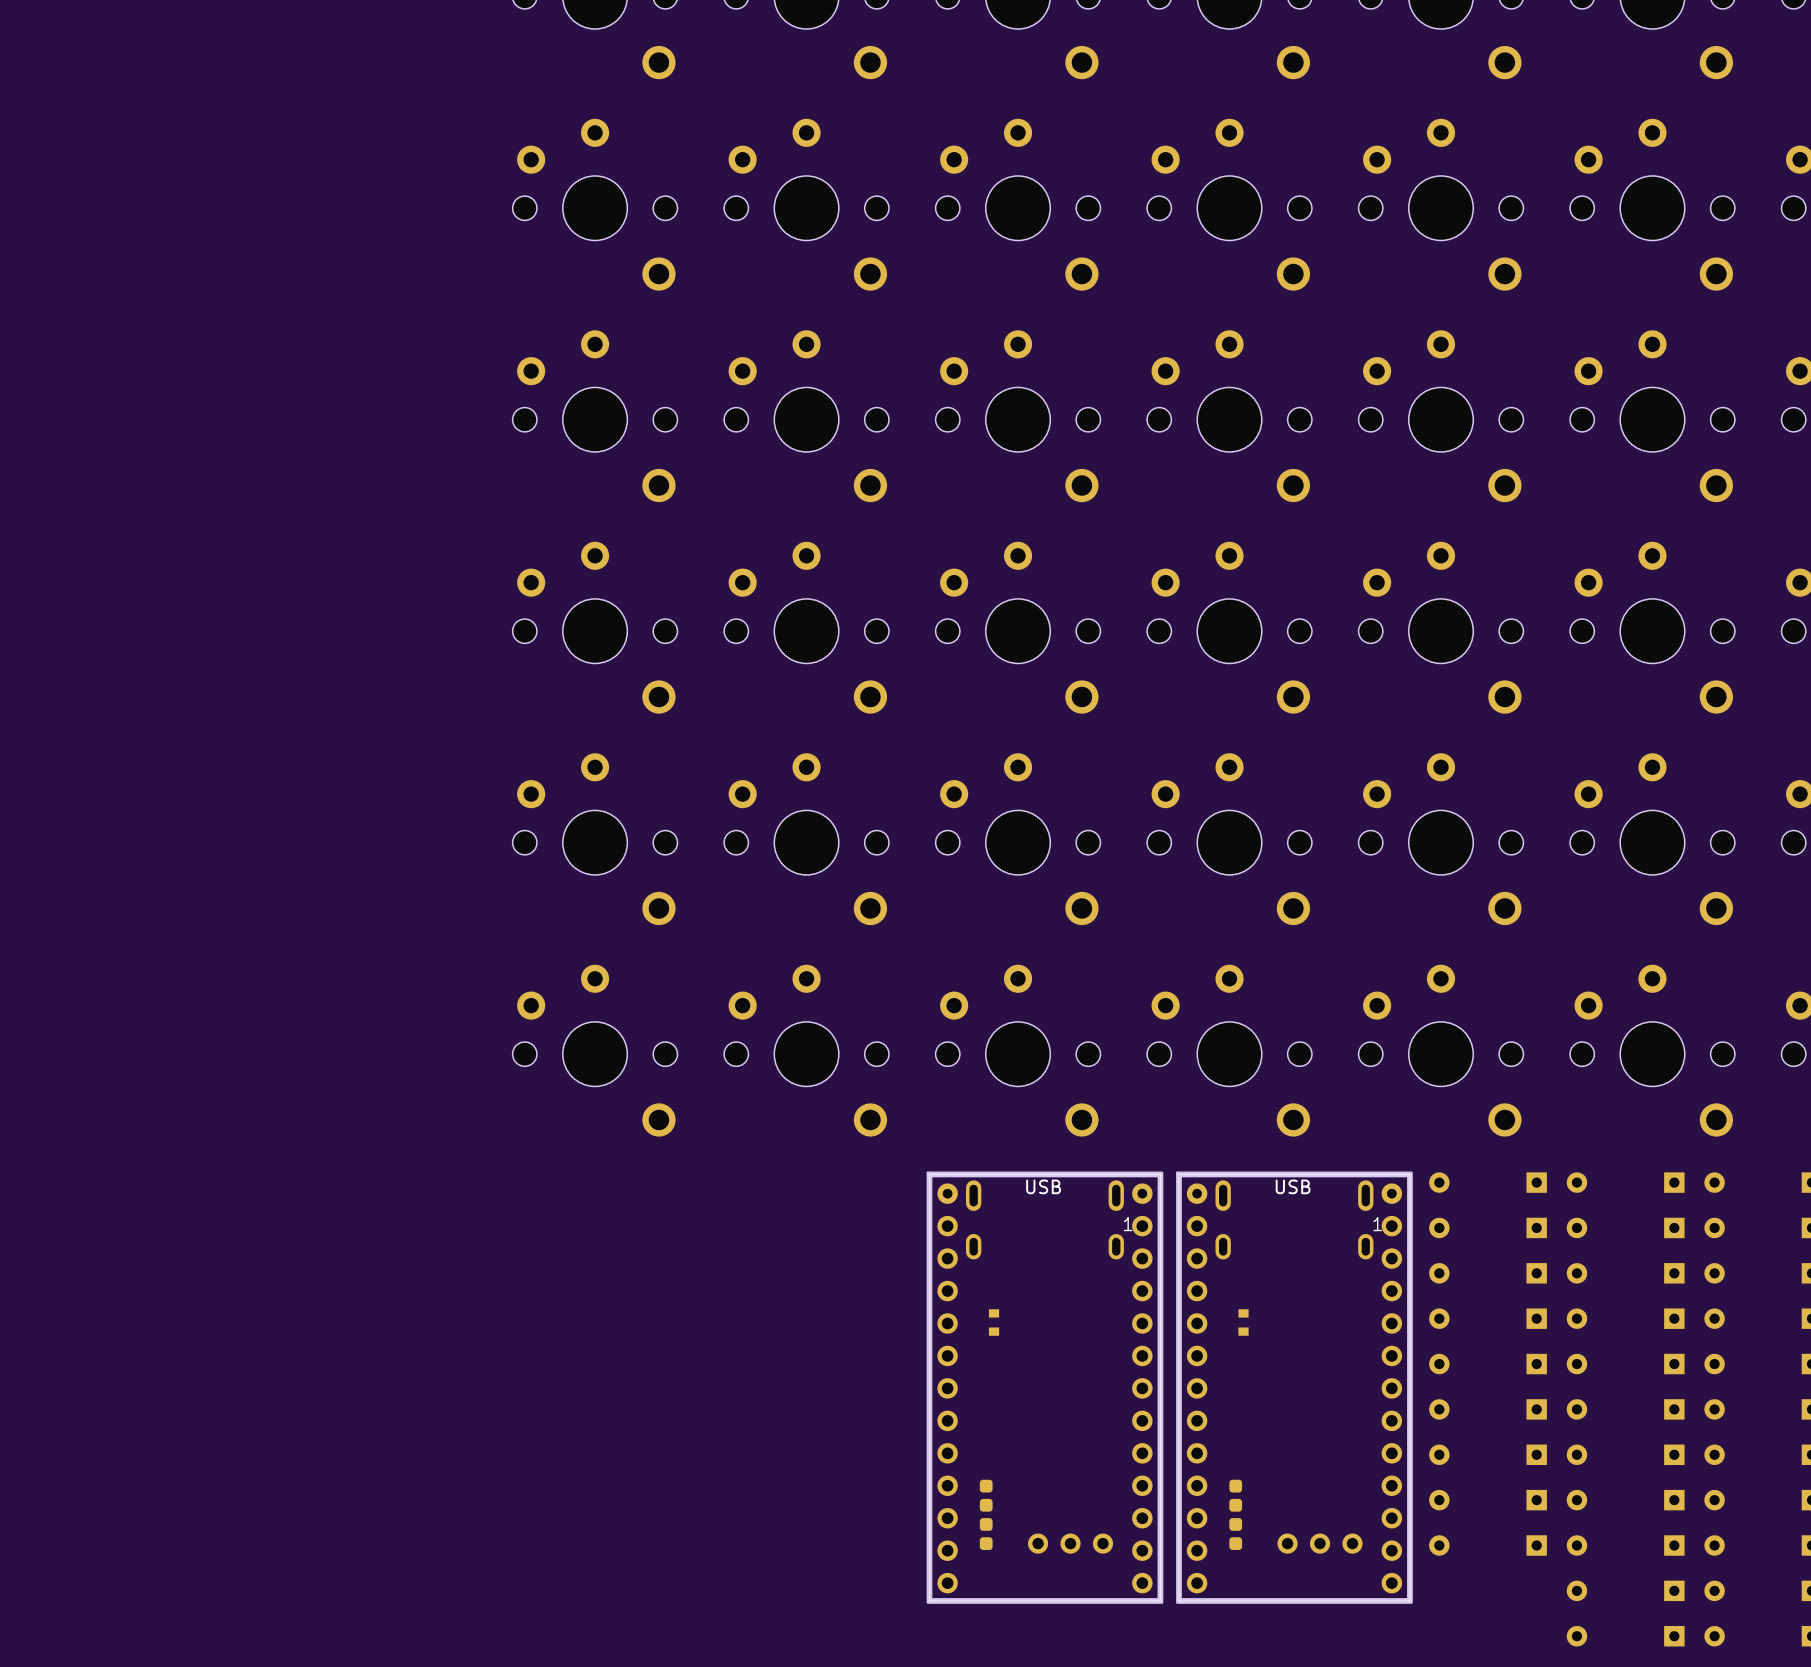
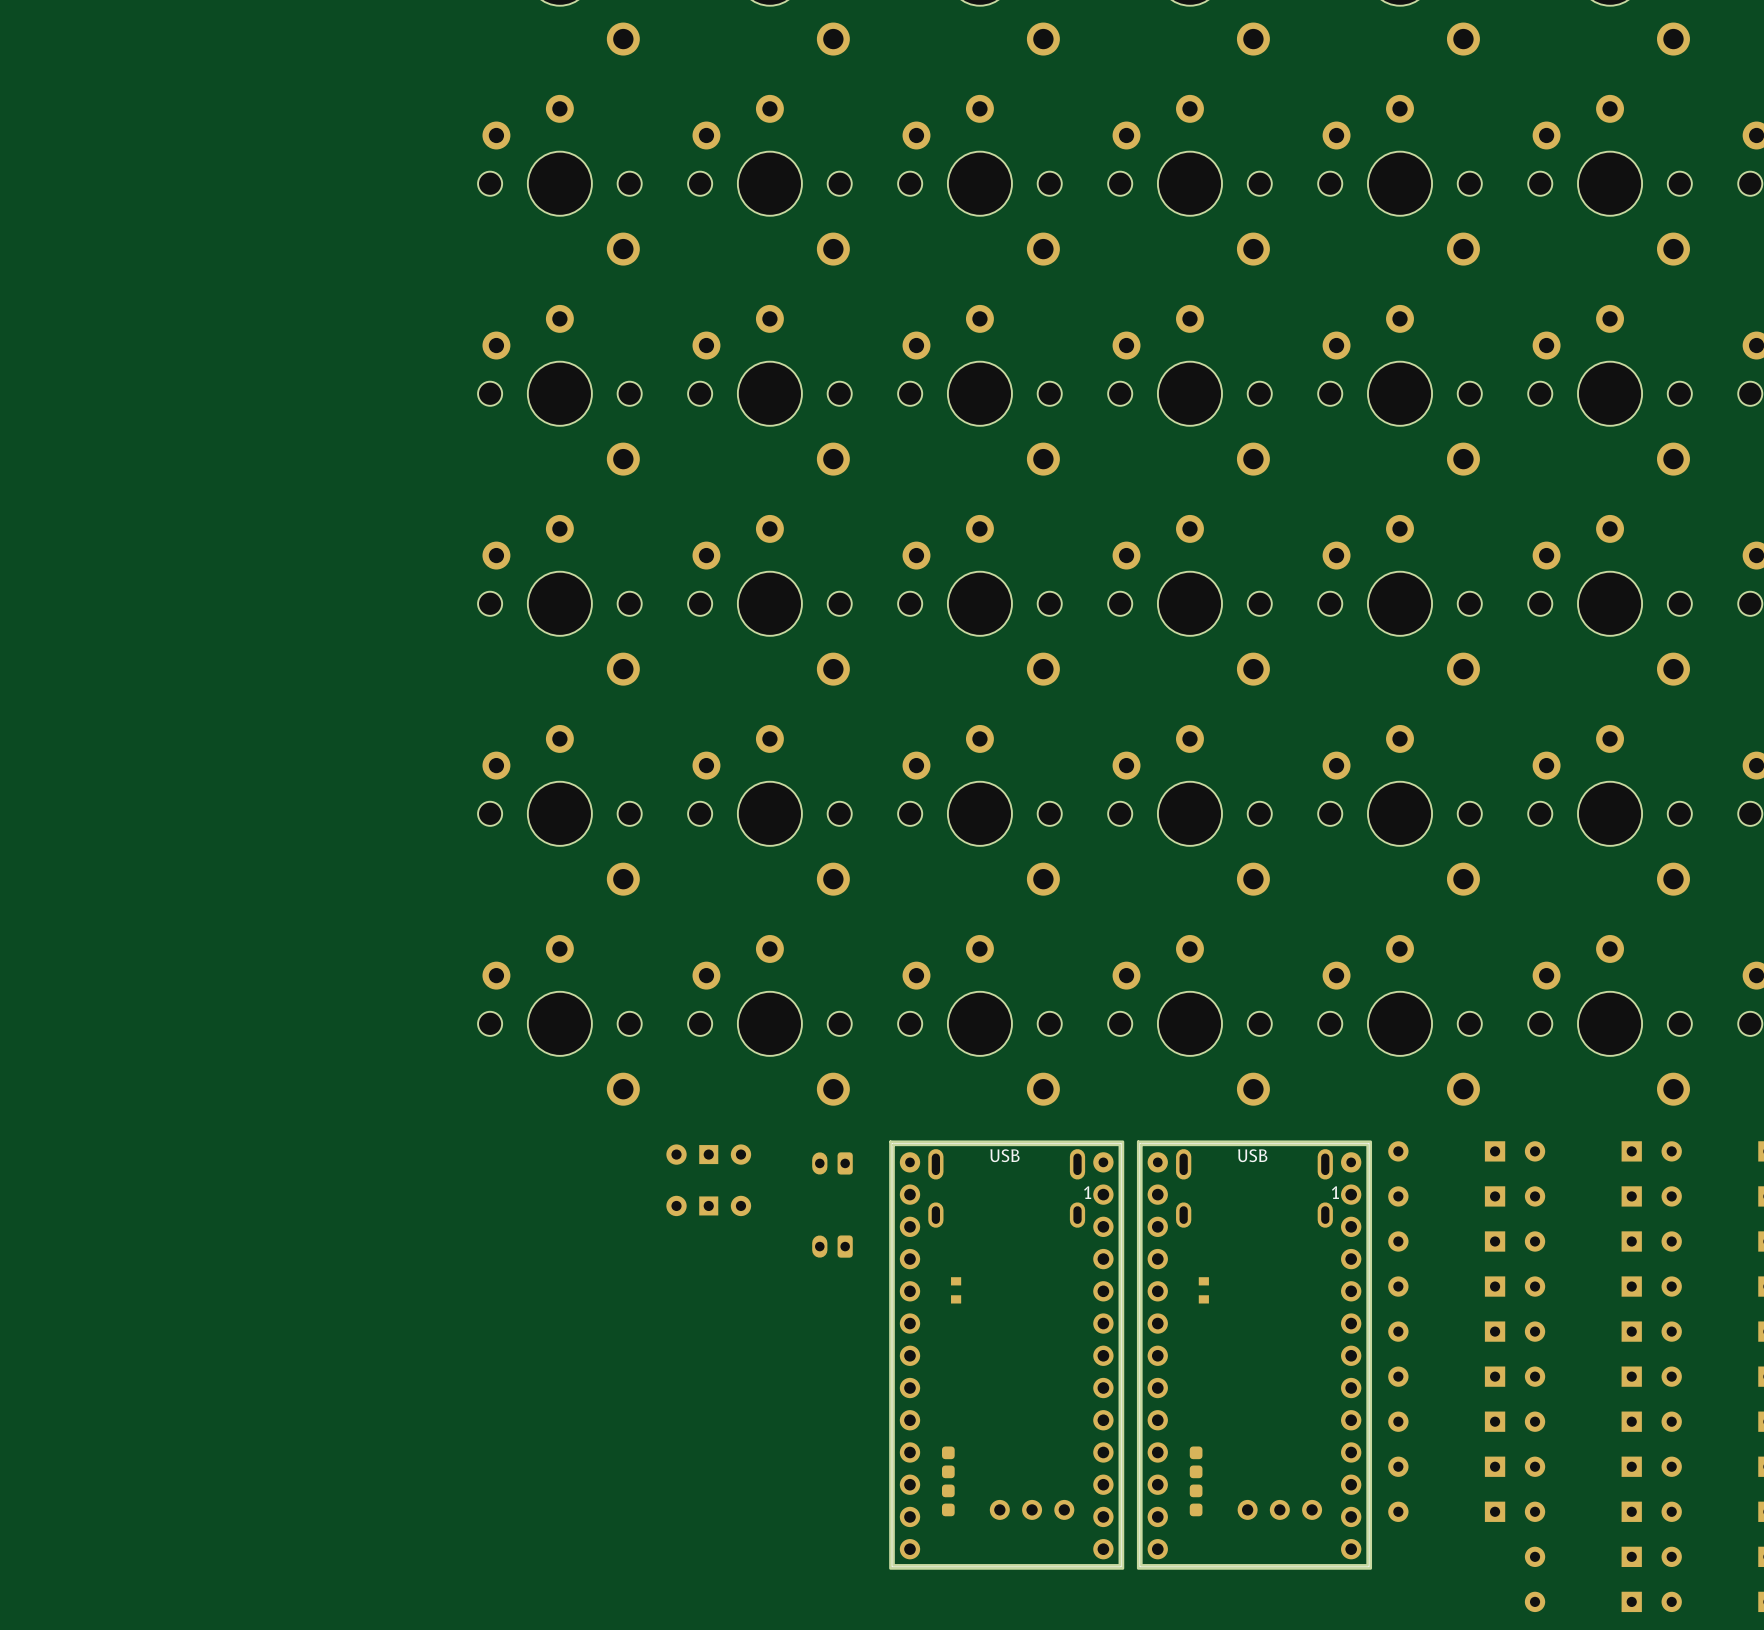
part: none -> (708, 1154)
part: none -> (832, 1163)
part: none -> (708, 1205)
part: none -> (832, 1246)

